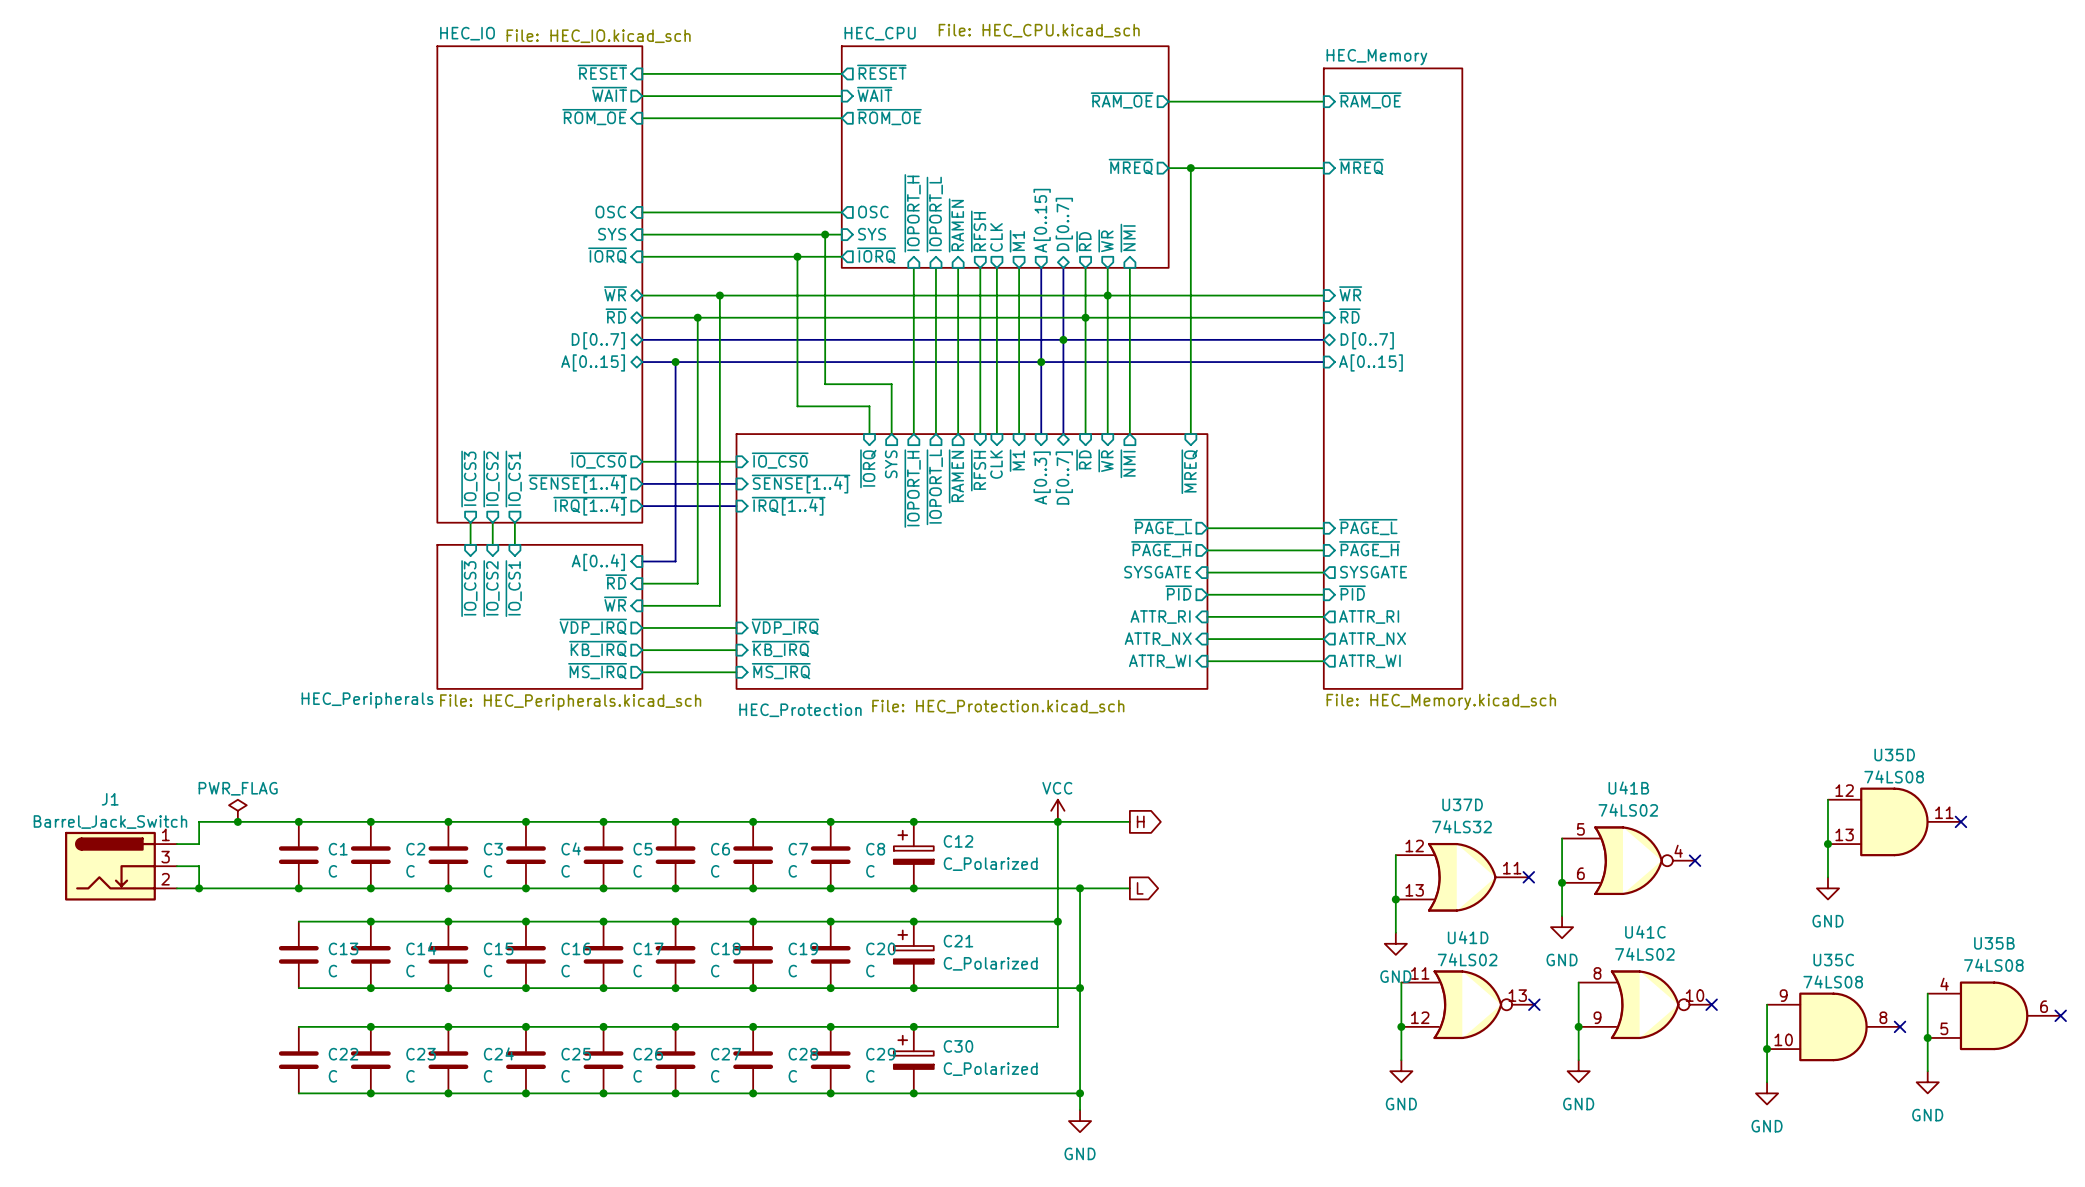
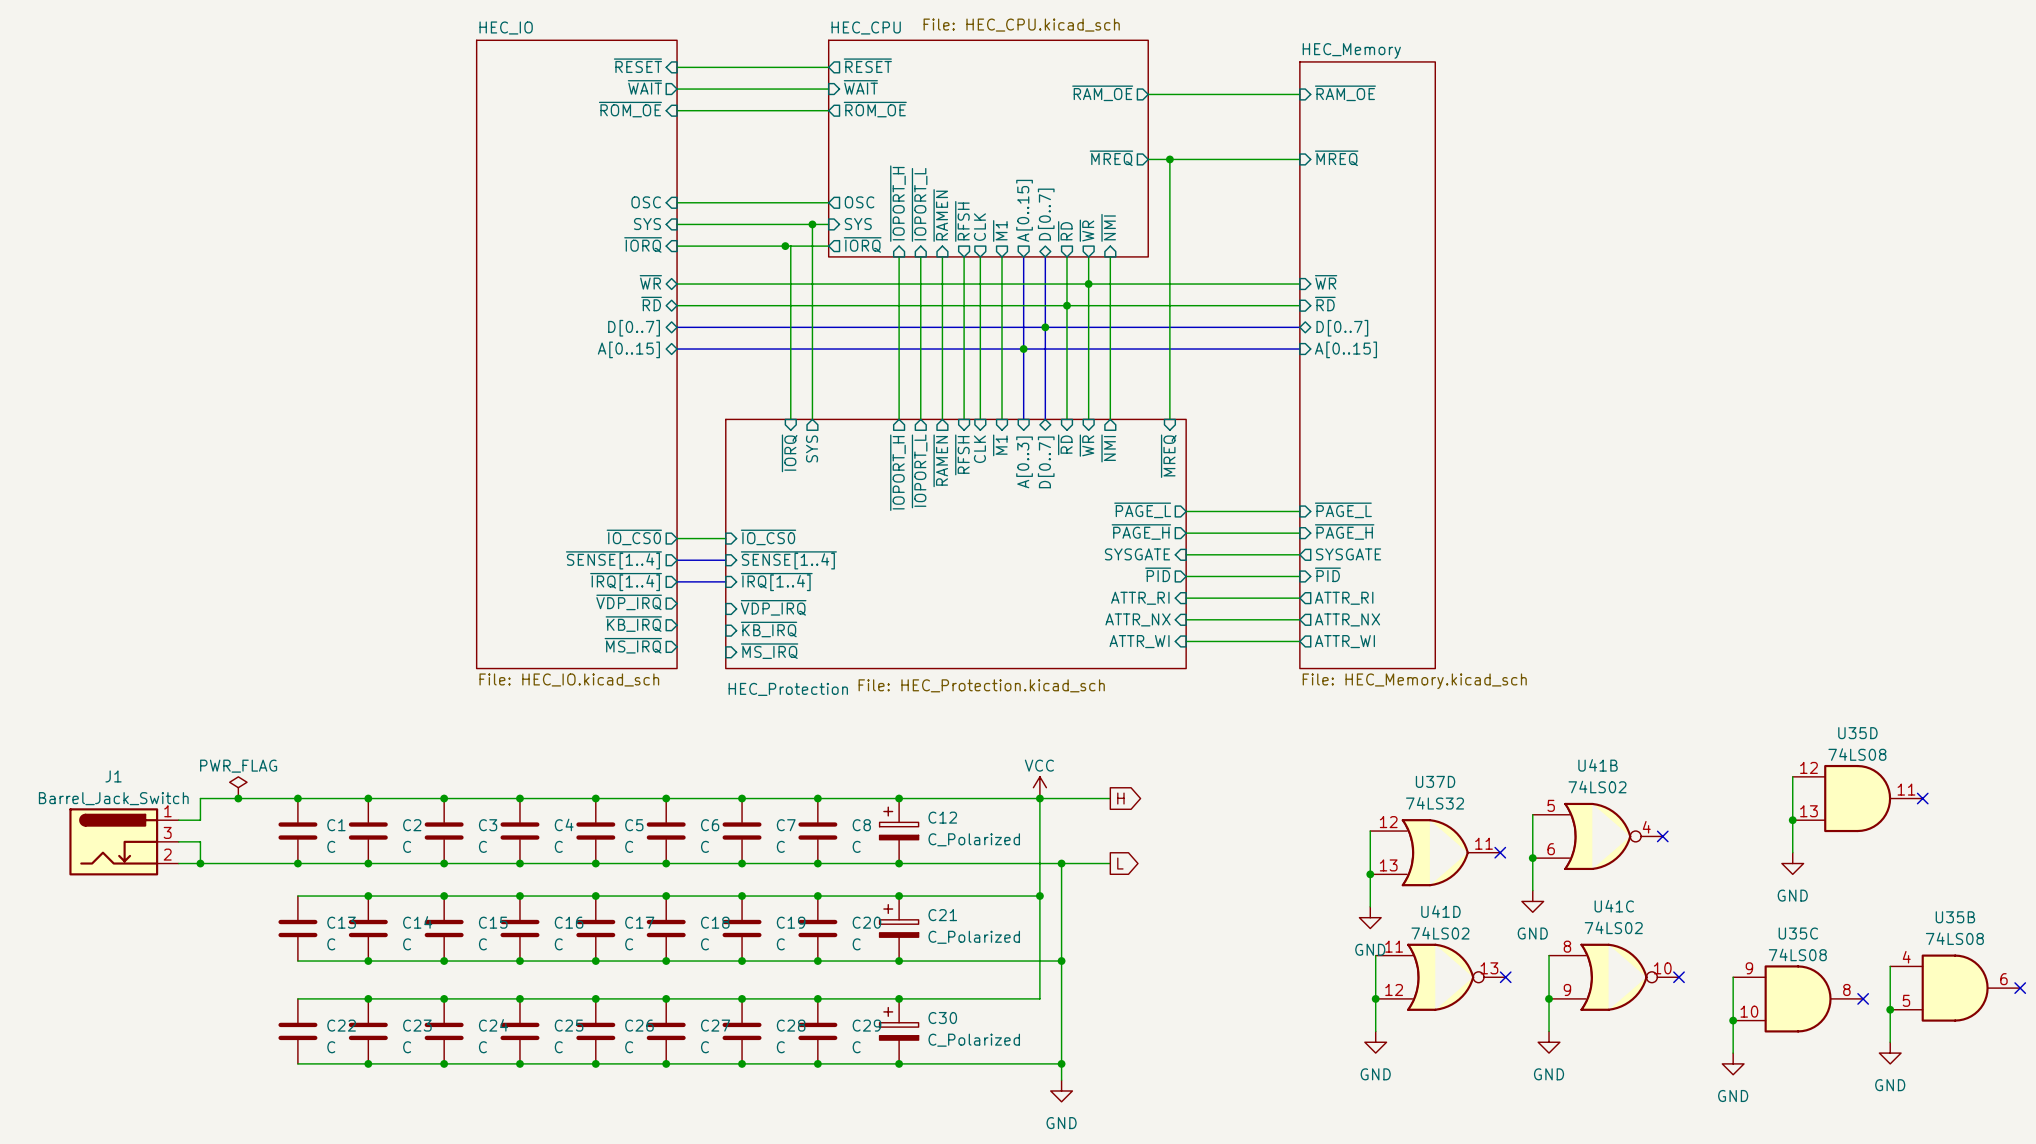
sheet pin position: ~{RESET} (602, 72) -> ~{RESET} (637, 65)
wire: (642, 73) (686, 73) -> none
sheet pin position: ~{WAIT} (609, 94) -> ~{WAIT} (644, 87)
wire: (642, 96) (686, 96) -> none
sheet pin position: ~{ROM_OE} (594, 117) -> ~{ROM_OE} (630, 109)
wire: (642, 118) (686, 118) -> none
sheet pin position: OSC (610, 212) -> OSC (646, 202)
wire: (642, 212) (686, 212) -> none
sheet pin position: SYS (612, 234) -> SYS (647, 224)
wire: (642, 234) (686, 234) -> none
sheet pin position: ~{IORQ} (607, 255) -> ~{IORQ} (643, 244)
wire: (642, 256) (686, 256) -> none
wire: (797, 256) (797, 406) (869, 406) (869, 434) -> none
wire: none -> (790, 246) (790, 419)
sheet HEC_IO: File: HEC_IO.kicad_sch (539, 284) -> none
sheet pin position: ~{WR} (615, 293) -> ~{WR} (650, 282)
wire: (642, 295) (686, 295) -> none
wire: (719, 295) (719, 605) (642, 605) -> none
junction: (719, 295) -> none
sheet pin position: ~{RD} (616, 316) -> ~{RD} (651, 304)
wire: (642, 317) (686, 317) -> none
wire: (697, 317) (697, 583) (642, 583) -> none
junction: (697, 317) -> none
bus: (642, 339) (686, 339) -> none
sheet pin position: D[0..7] (598, 340) -> D[0..7] (634, 328)
sheet pin position: A[0..15] (593, 362) -> A[0..15] (628, 349)
bus: (642, 362) (686, 362) -> none
bus: (675, 362) (675, 561) (642, 561) -> none
junction: (675, 362) -> none
sheet HEC_IO: none -> File: HEC_IO.kicad_sch (576, 354)
wire: (825, 384) (891, 384) (891, 434) -> (812, 370) (812, 419)
sheet pin: ~{IO_CS0} (598, 460) -> none
sheet pin: ~{IO_CS0} (780, 460) -> none
wire: (642, 461) (736, 461) -> none
sheet pin position: SYS (891, 464) -> SYS (812, 448)
sheet pin position: ~{IORQ} (868, 468) -> ~{IORQ} (789, 453)
sheet pin: ~{IO_CS3} (469, 479) -> none
sheet pin: ~{IO_CS2} (491, 479) -> none
sheet pin: ~{IO_CS1} (513, 479) -> none
bus: (642, 483) (736, 483) -> none
sheet pin: ~{SENSE[1..4]} (577, 484) -> none
sheet pin: ~{SENSE[1..4]} (801, 484) -> none
sheet pin: ~{IRQ[1..4]} (590, 506) -> none
bus: (642, 506) (736, 506) -> none
sheet pin: ~{IRQ[1..4]} (788, 506) -> none
wire: (470, 522) (470, 544) -> none
wire: (492, 522) (492, 544) -> none
wire: (514, 522) (514, 544) -> none
sheet pin: none -> ~{IO_CS0} (634, 537)
sheet pin: none -> ~{IO_CS0} (768, 537)
wire: none -> (677, 538) (725, 538)
sheet pin: A[0..4] (598, 562) -> none
sheet pin: none -> ~{SENSE[1..4]} (613, 560)
bus: none -> (677, 560) (725, 560)
sheet pin: none -> ~{SENSE[1..4]} (788, 560)
sheet pin: ~{RD} (616, 581) -> none
sheet pin: ~{IO_CS3} (469, 588) -> none
sheet pin: ~{IO_CS2} (491, 588) -> none
sheet pin: ~{IO_CS1} (513, 588) -> none
sheet pin: none -> ~{IRQ[1..4]} (626, 582)
bus: none -> (677, 581) (725, 581)
sheet pin: none -> ~{IRQ[1..4]} (776, 582)
sheet pin: ~{WR} (615, 604) -> none
sheet HEC_Peripherals: File: HEC_Peripherals.kicad_sch (539, 616) -> none
sheet pin position: ~{VDP_IRQ} (593, 626) -> ~{VDP_IRQ} (629, 602)
wire: (642, 627) (736, 627) -> none
sheet pin position: ~{KB_IRQ} (598, 648) -> ~{KB_IRQ} (633, 624)
wire: (642, 650) (736, 650) -> none
sheet pin position: ~{MS_IRQ} (597, 671) -> ~{MS_IRQ} (633, 645)
wire: (642, 672) (736, 672) -> none

